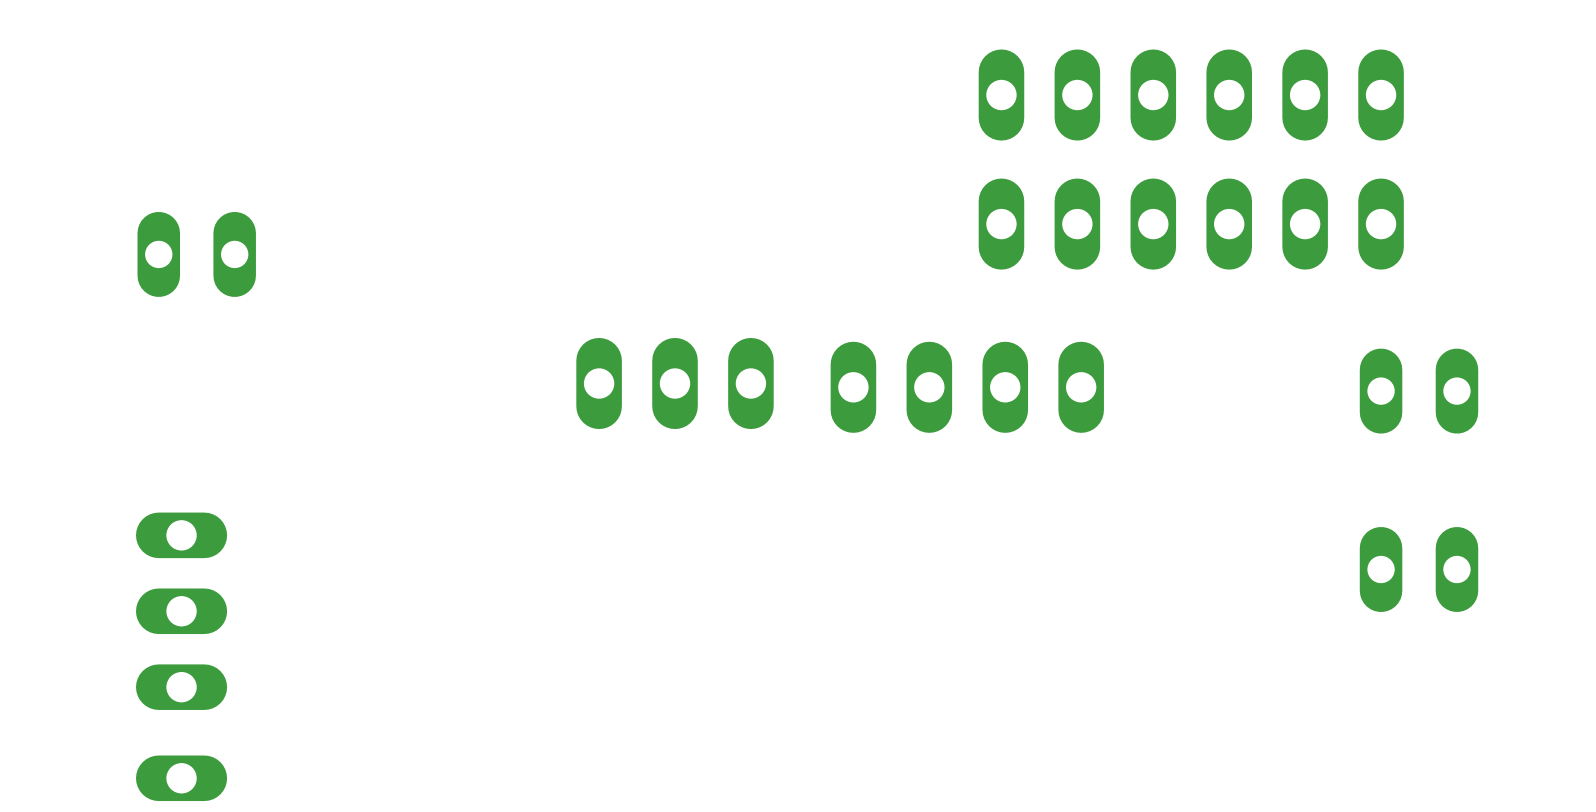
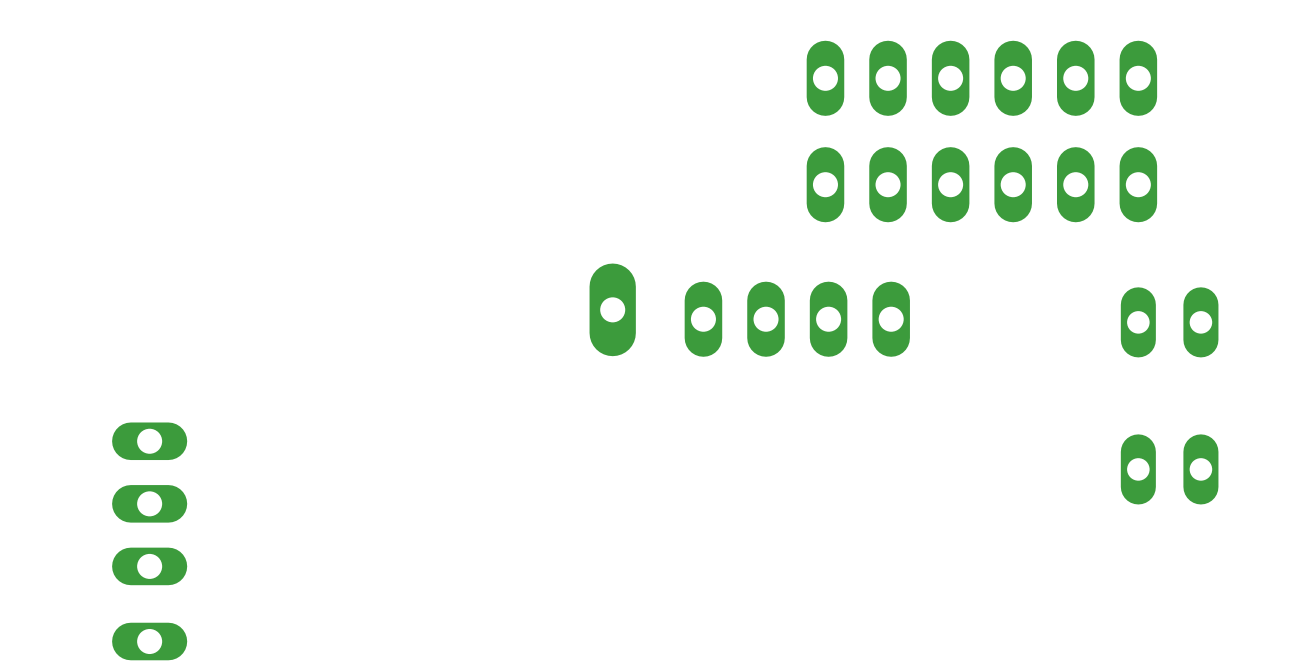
part: (196, 254) -> none
part: none -> (612, 309)
part: (675, 383) -> none

